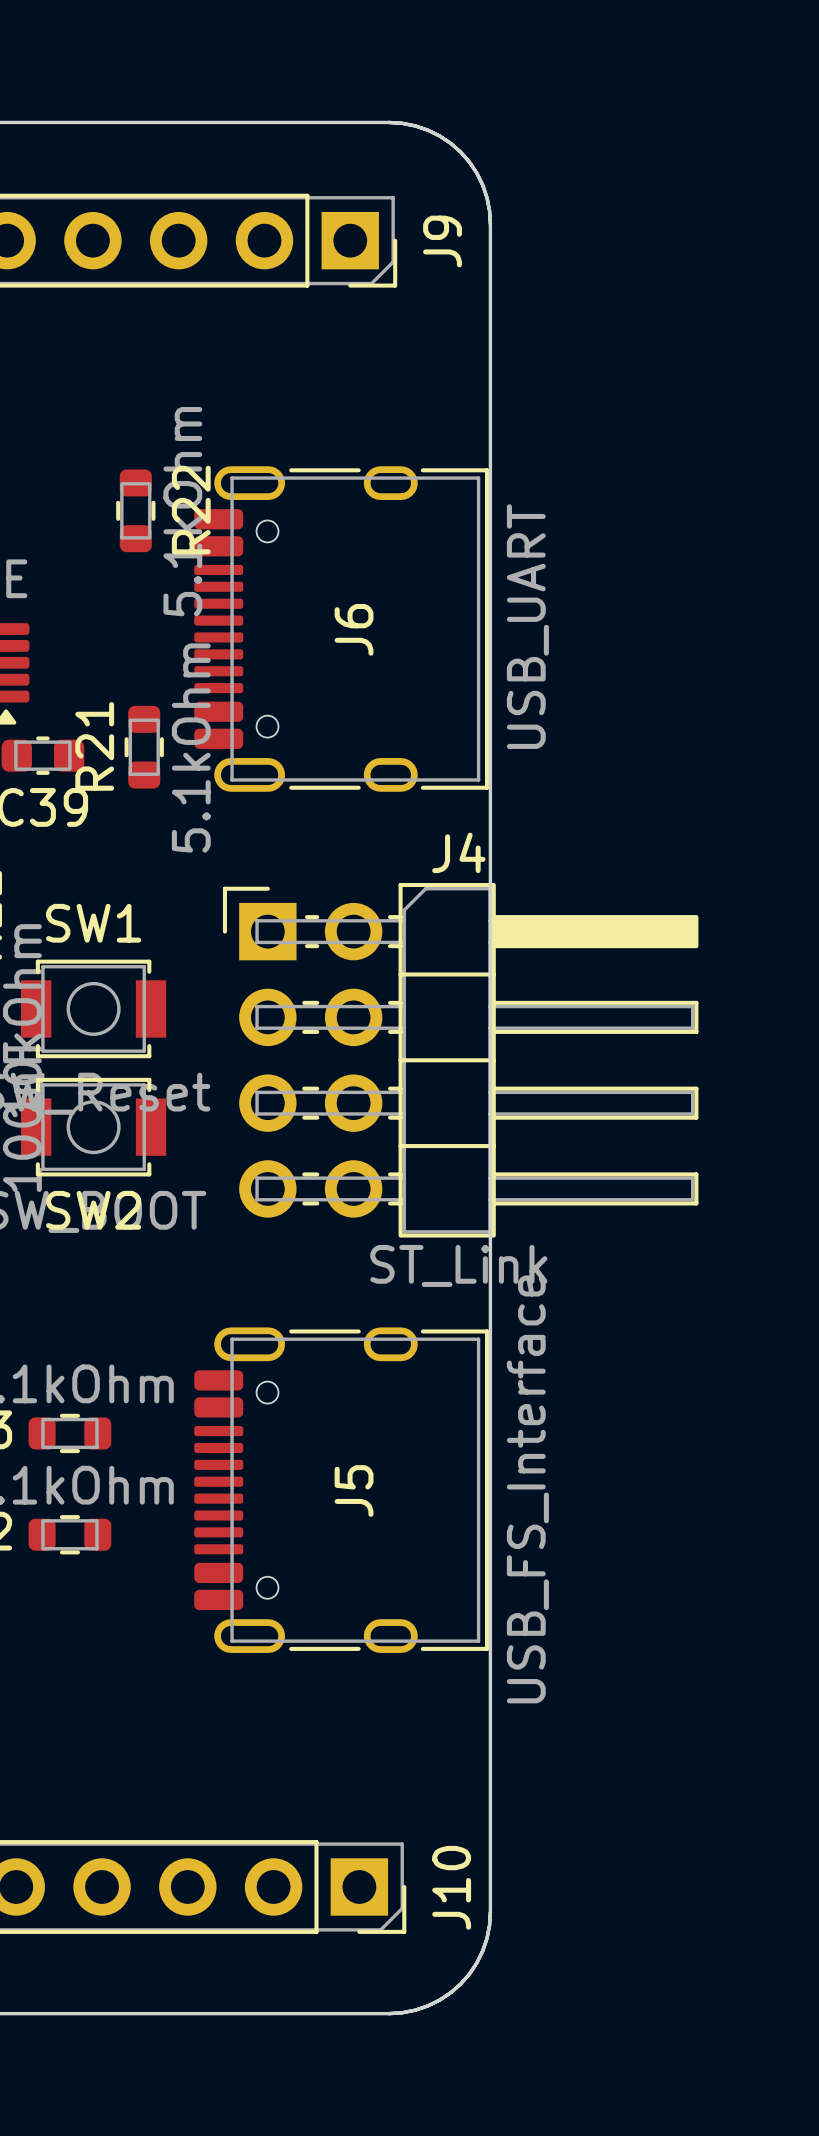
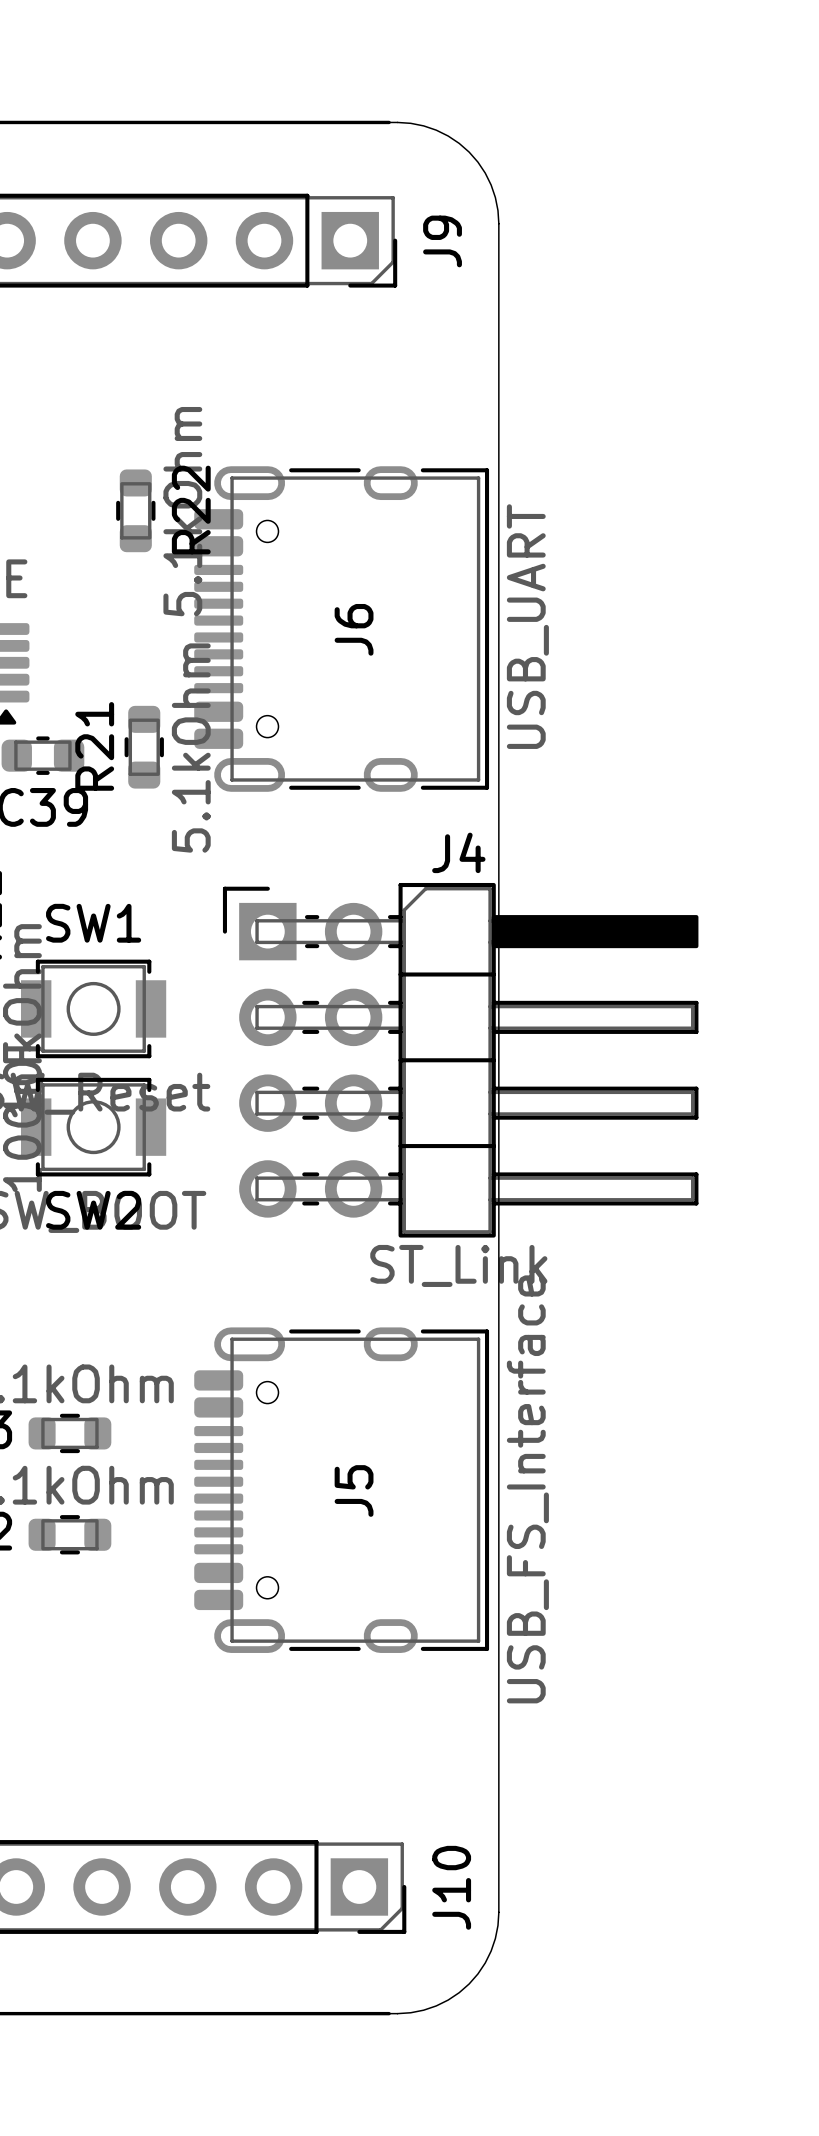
board edge: none -> (389, 122) (410, 123) (436, 130) (459, 143) (469, 152) (477, 162) (491, 185) (495, 197) (498, 223) (498, 1912) (497, 1925) (491, 1951) (485, 1962) (469, 1983) (448, 2000) (436, 2005) (410, 2012) (389, 2013)
board edge: (490, 223) (490, 1912) -> none
board edge: (490, 223) (486, 197) (482, 185) (469, 162) (460, 152) (439, 136) (427, 130) (415, 125) (389, 122) (402, 123) (415, 125) (427, 130) (439, 136) (460, 152) (469, 162) (482, 185) (486, 197) (490, 223) -> none
board edge: (490, 1912) (489, 1925) (482, 1951) (476, 1962) (460, 1983) (439, 2000) (427, 2005) (415, 2010) (389, 2013) (415, 2010) (427, 2005) (439, 2000) (460, 1983) (476, 1962) (482, 1951) (489, 1925) (490, 1912) -> none

